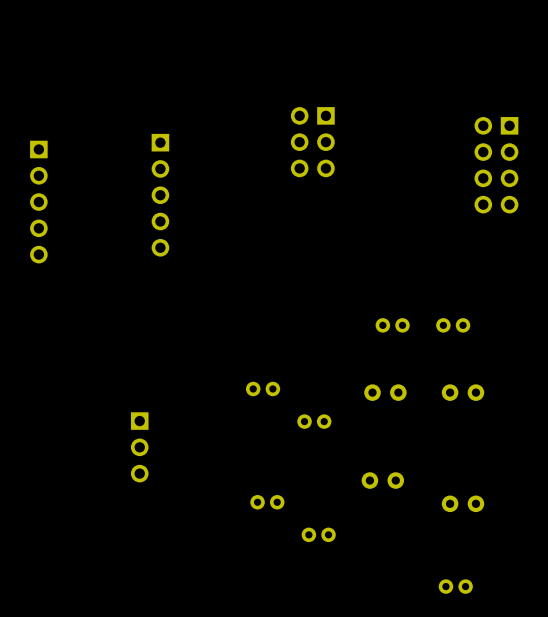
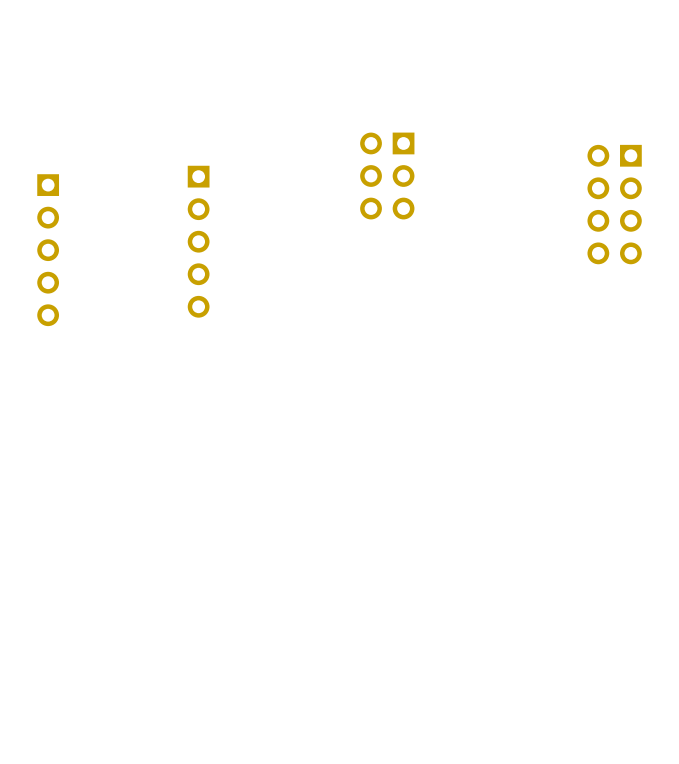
part: (392, 325) -> none
part: (453, 325) -> none
part: (263, 388) -> none
part: (385, 392) -> none
part: (463, 392) -> none
part: (314, 421) -> none
part: (139, 447) -> none
part: (382, 480) -> none
part: (267, 502) -> none
part: (463, 503) -> none
part: (318, 534) -> none
part: (455, 586) -> none

